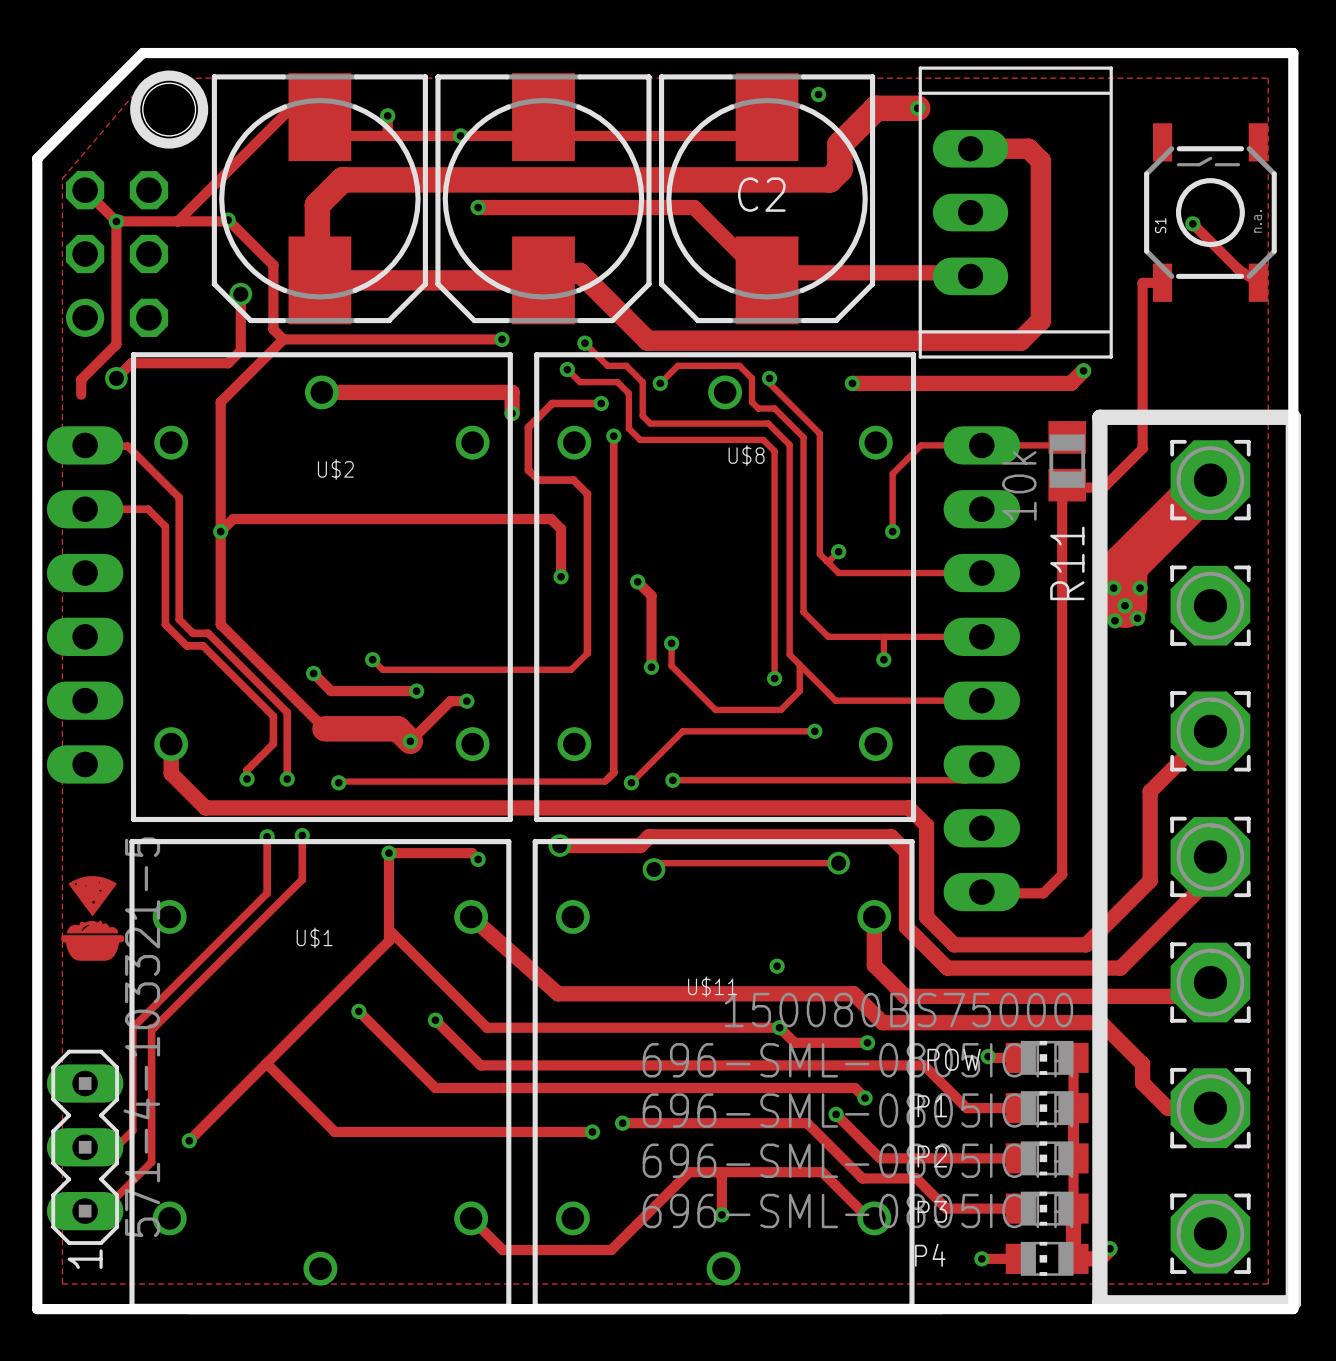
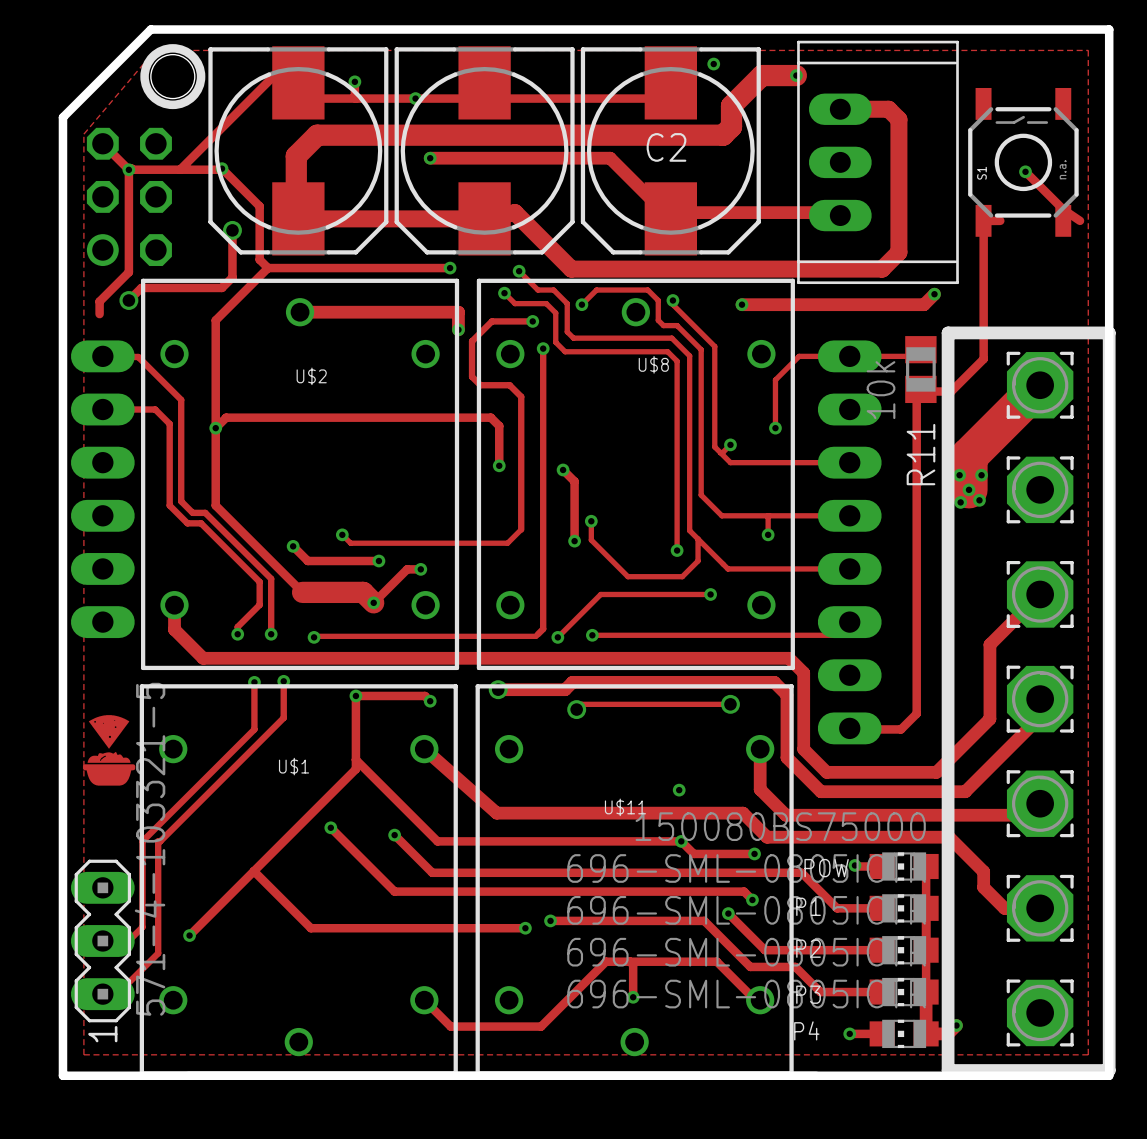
S1 position: (1210, 212) -> (1023, 162)

